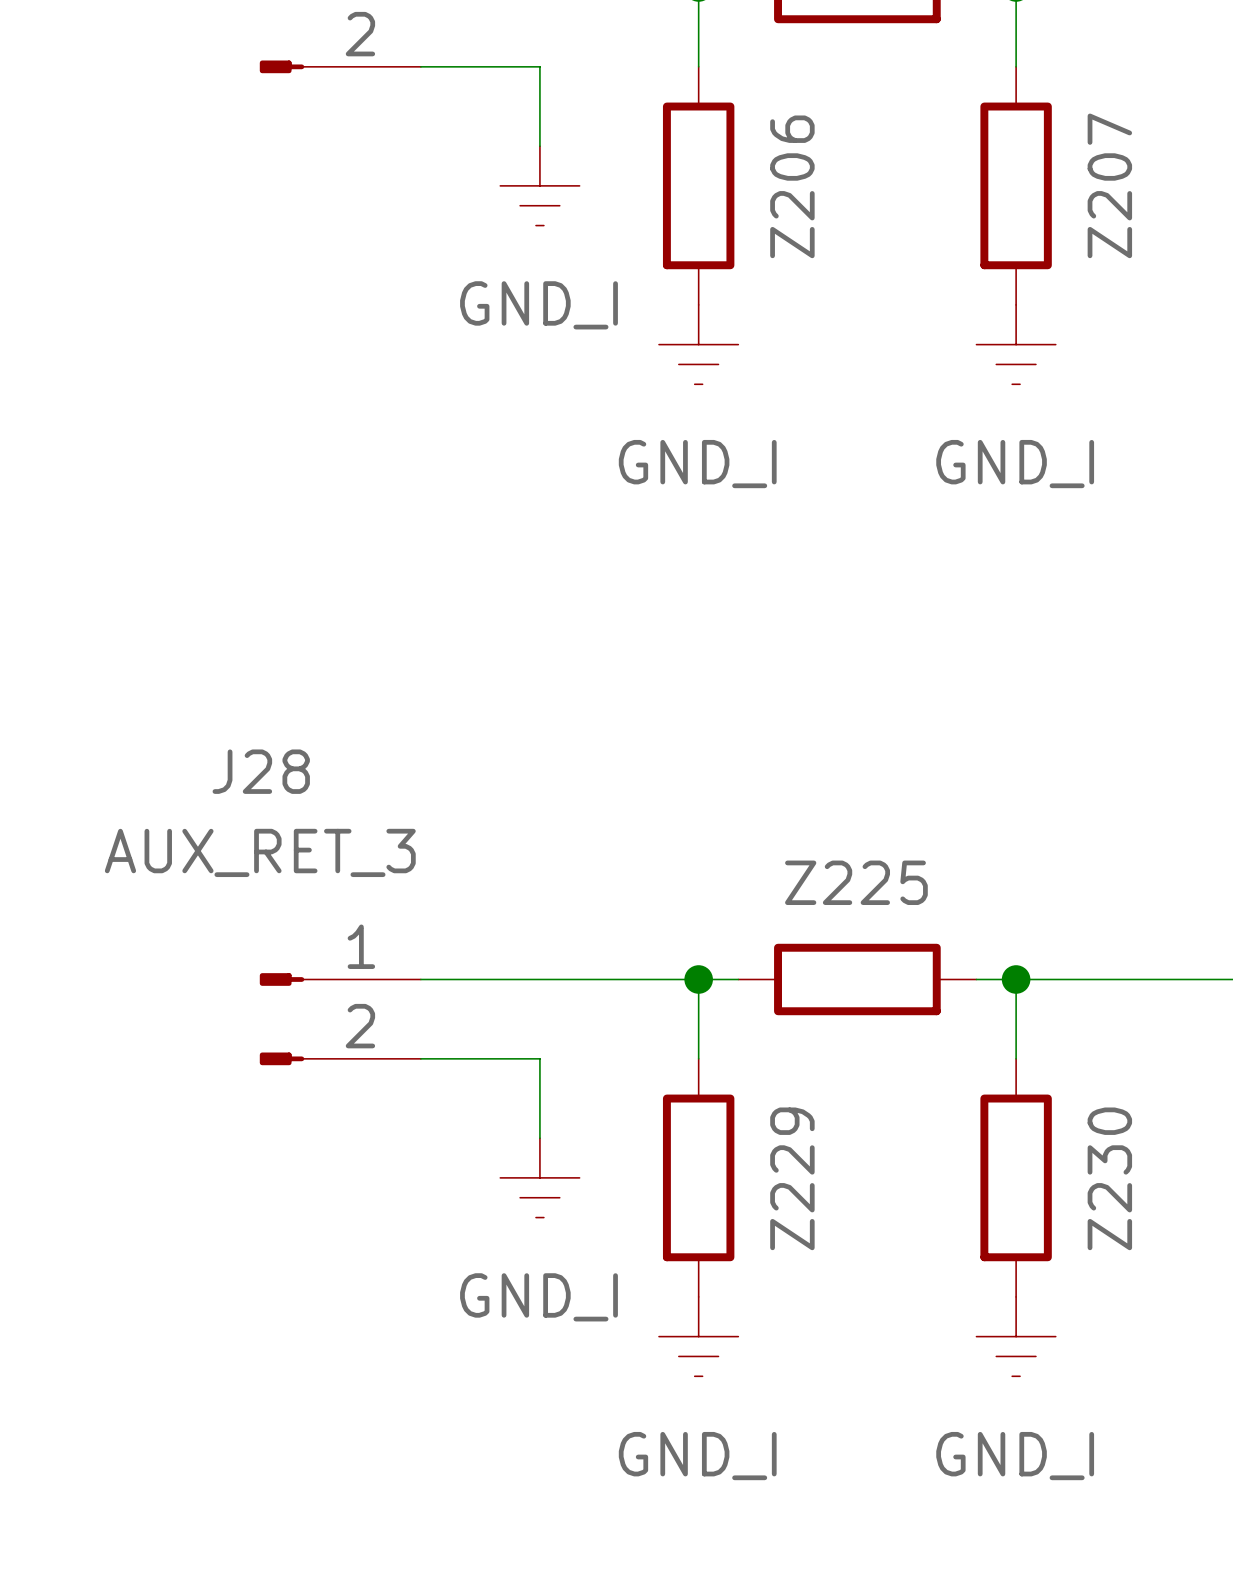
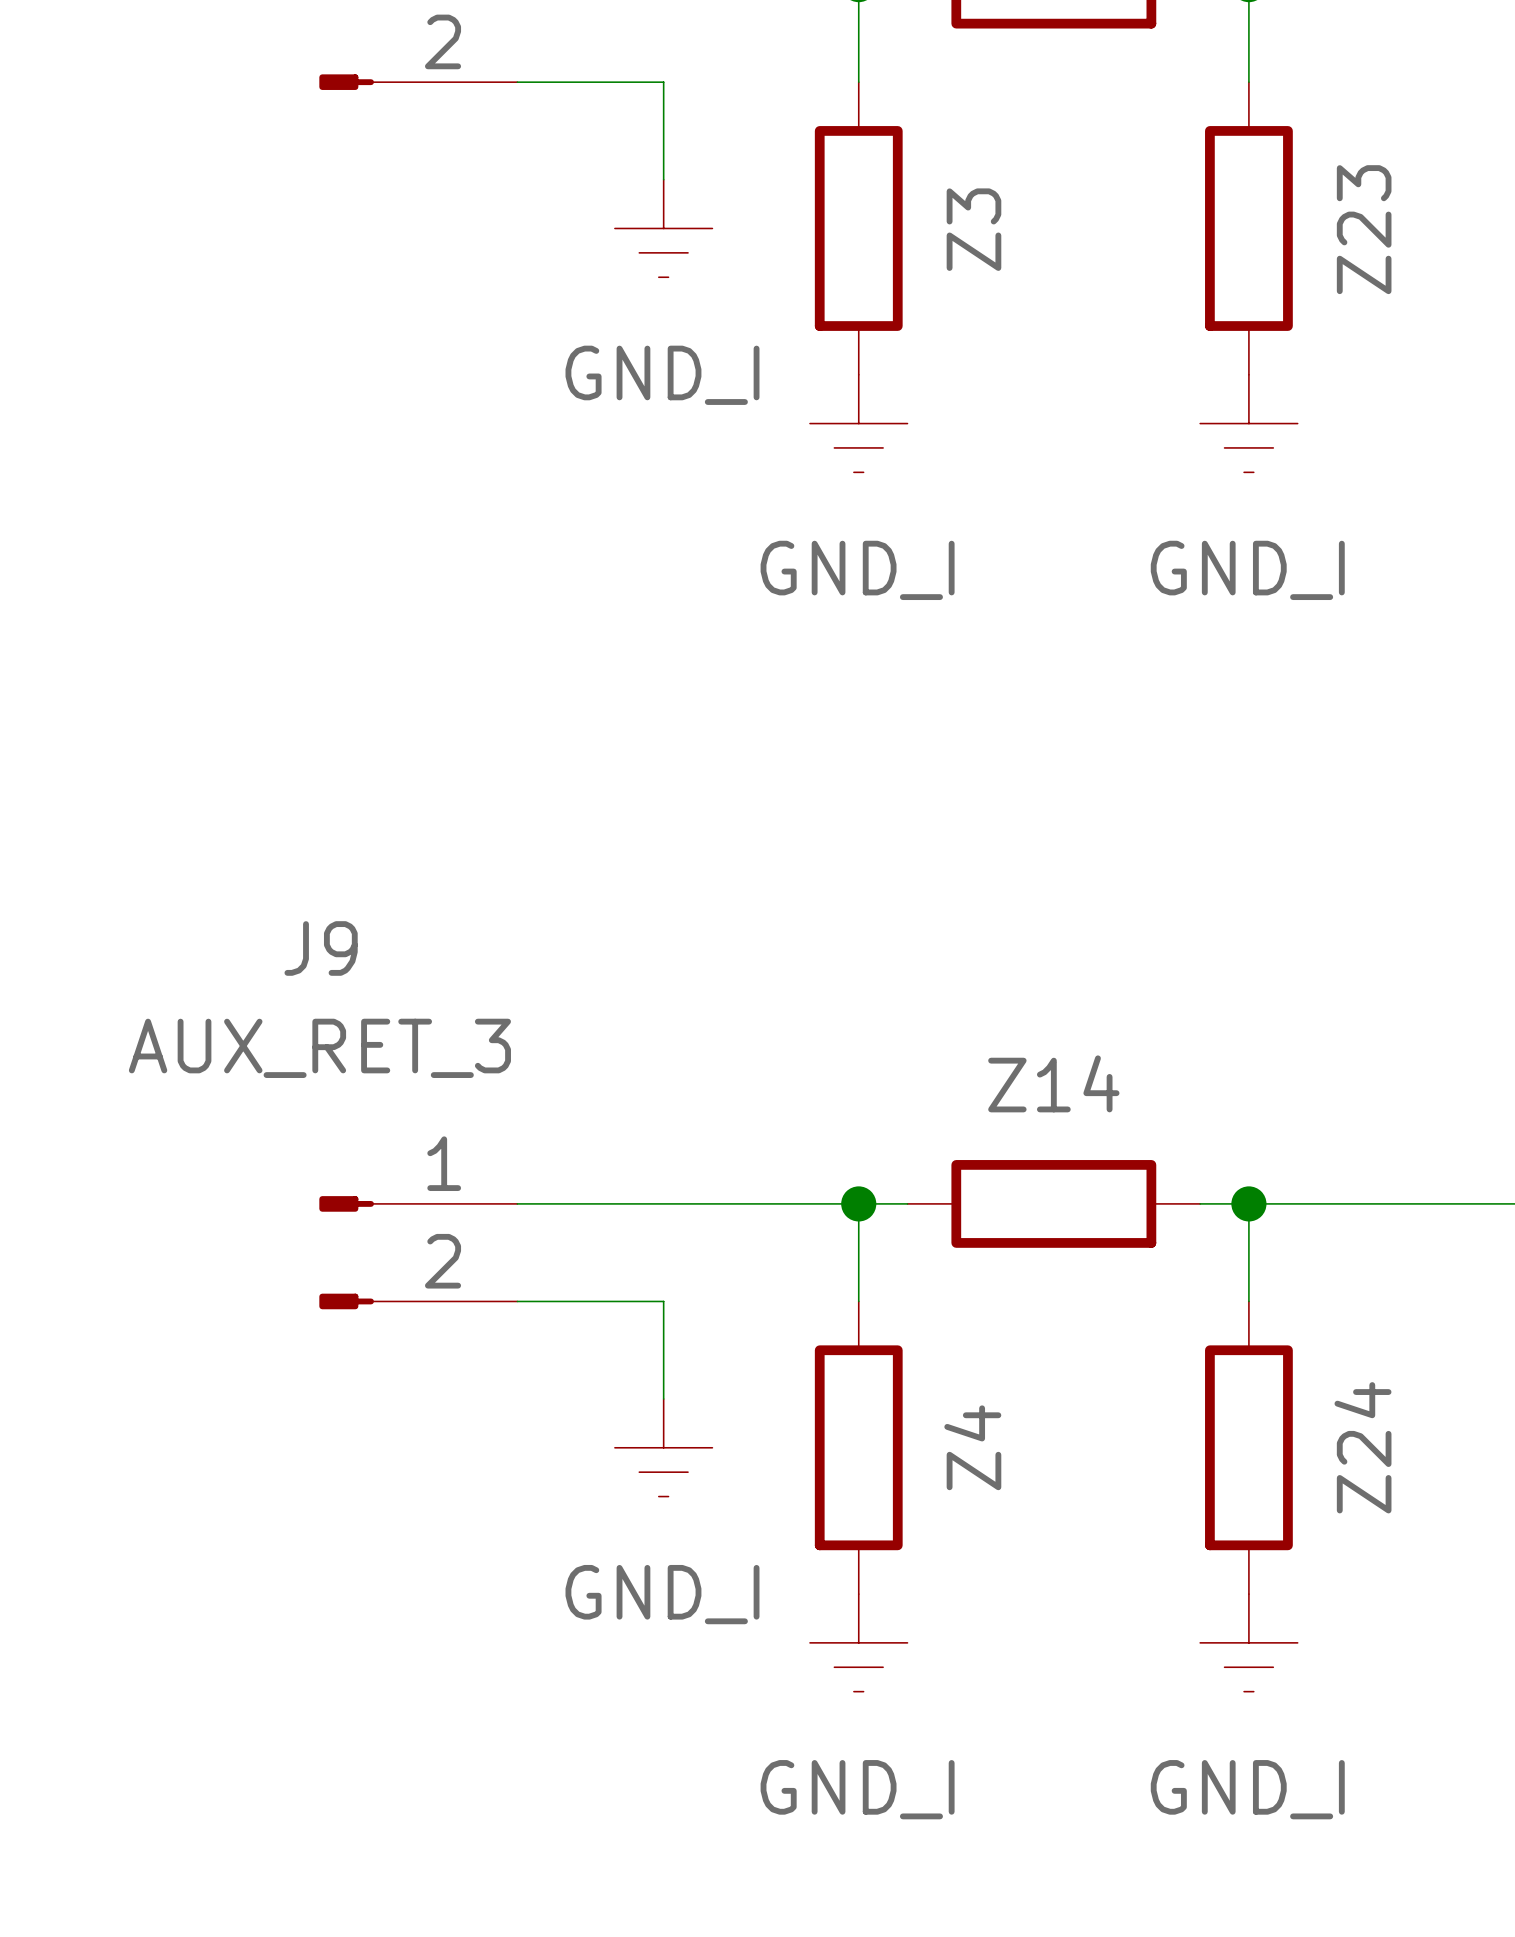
Z207 name: Z207 (1109, 185) -> Z23 (1364, 229)
Z206 name: Z206 (792, 186) -> Z3 (973, 229)
J28 name: J28 (261, 771) -> J9 (321, 948)
Z225 name: Z225 (856, 882) -> Z14 (1053, 1083)
Z229 name: Z229 (792, 1178) -> Z4 (972, 1447)
Z230 name: Z230 (1109, 1178) -> Z24 (1362, 1447)

